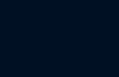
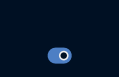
track: none -> (63, 55) (55, 55)
via: none -> (63, 55)

